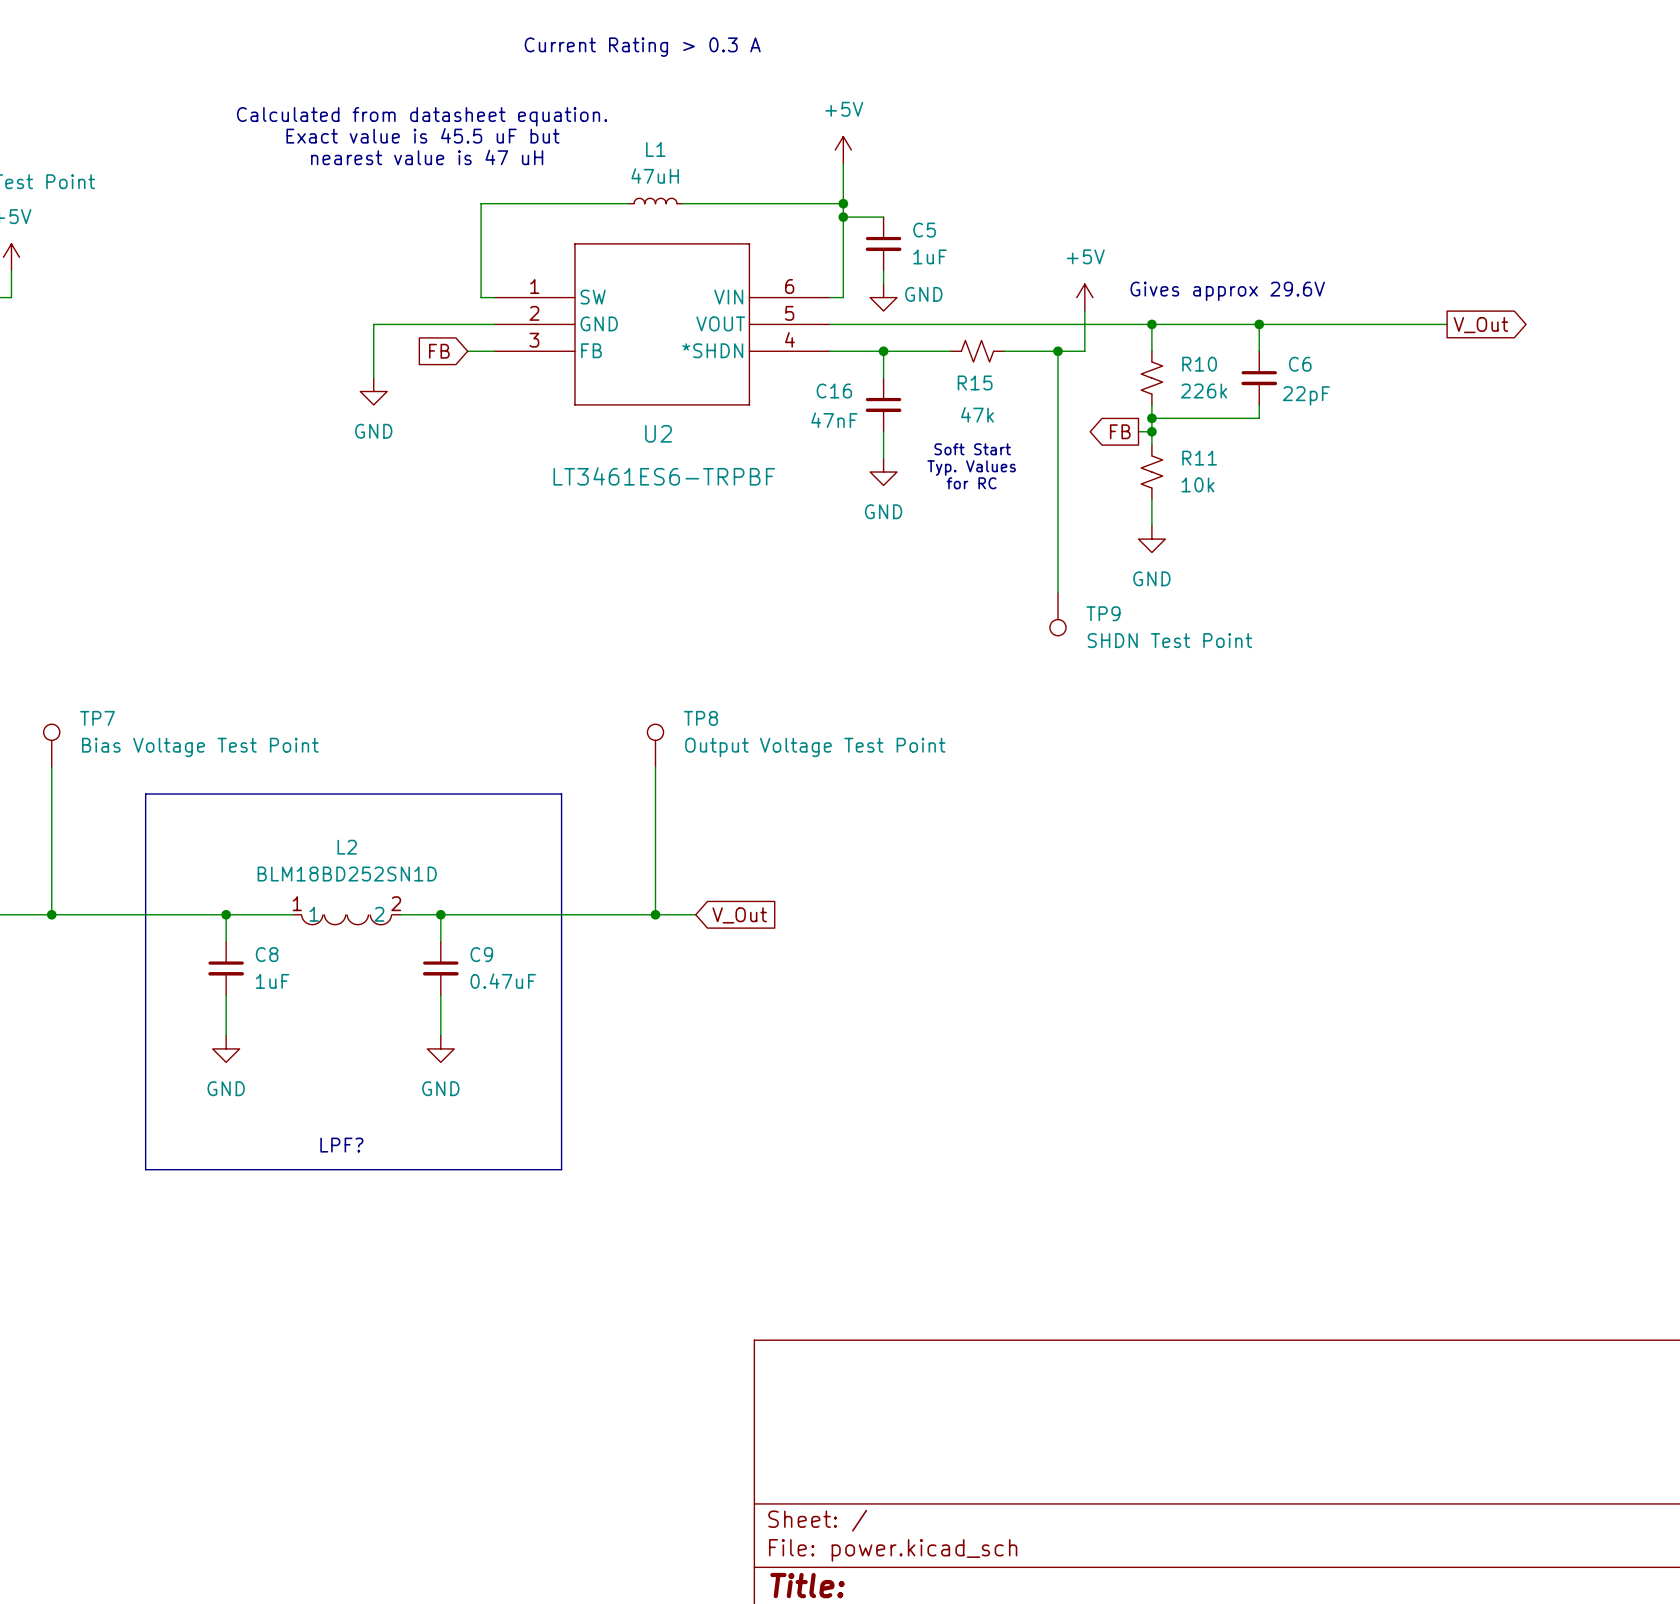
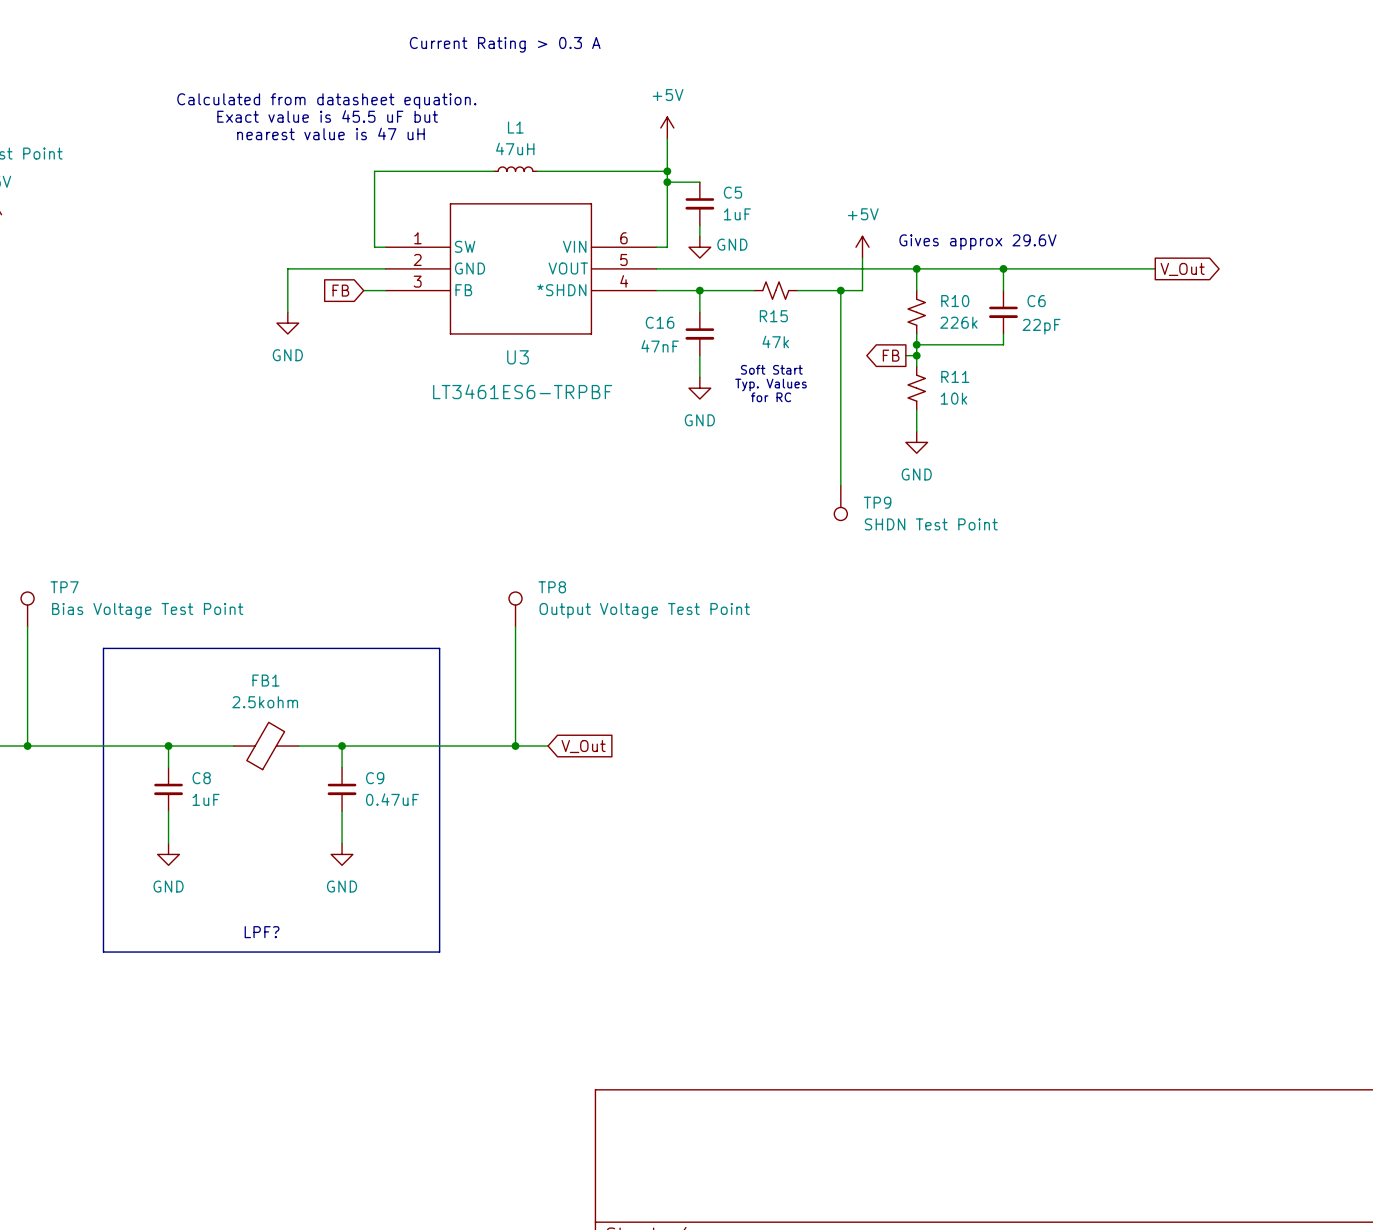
U2 name: U2 (658, 433) -> U3 (518, 357)
FB1: none -> 2.5kohm (266, 746)
L2: BLM18BD252SN1D (346, 919) -> none

